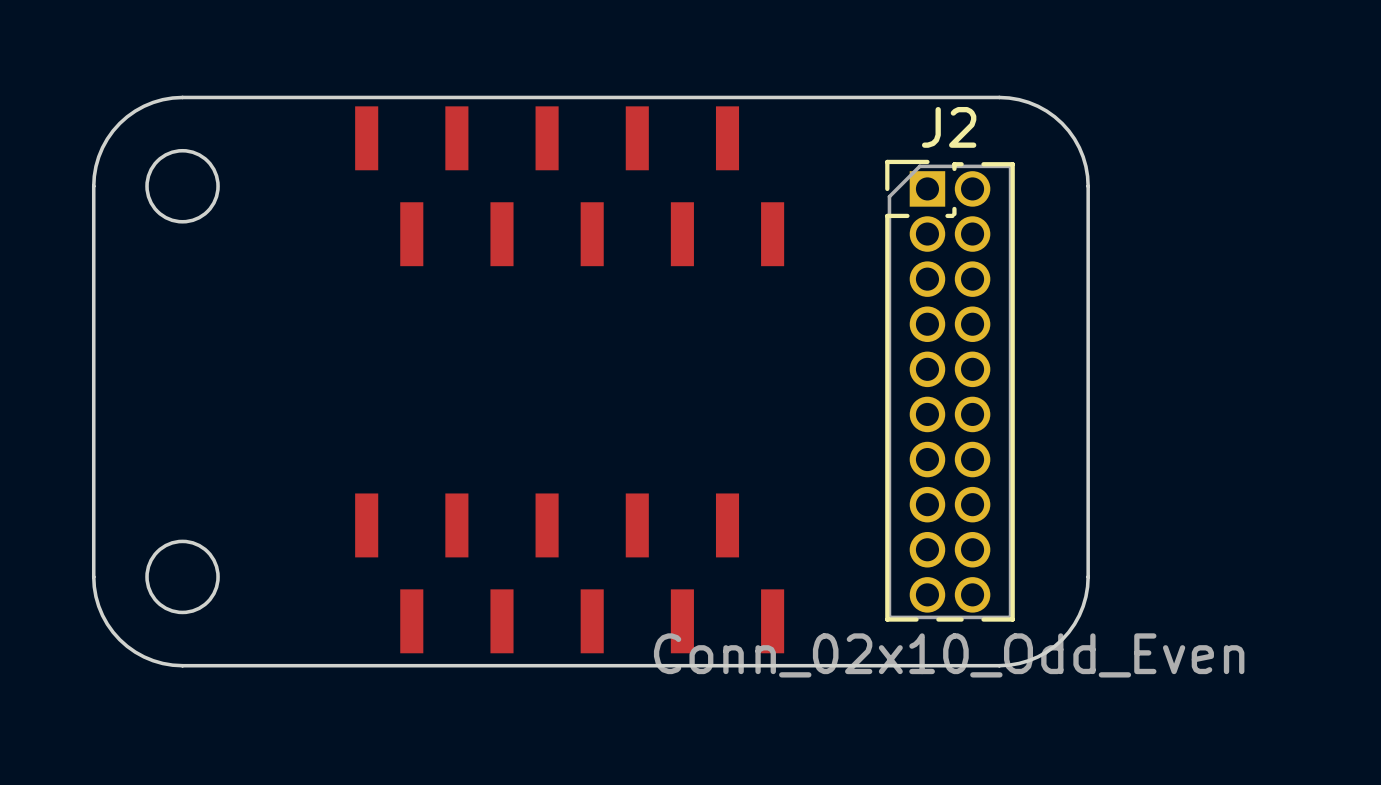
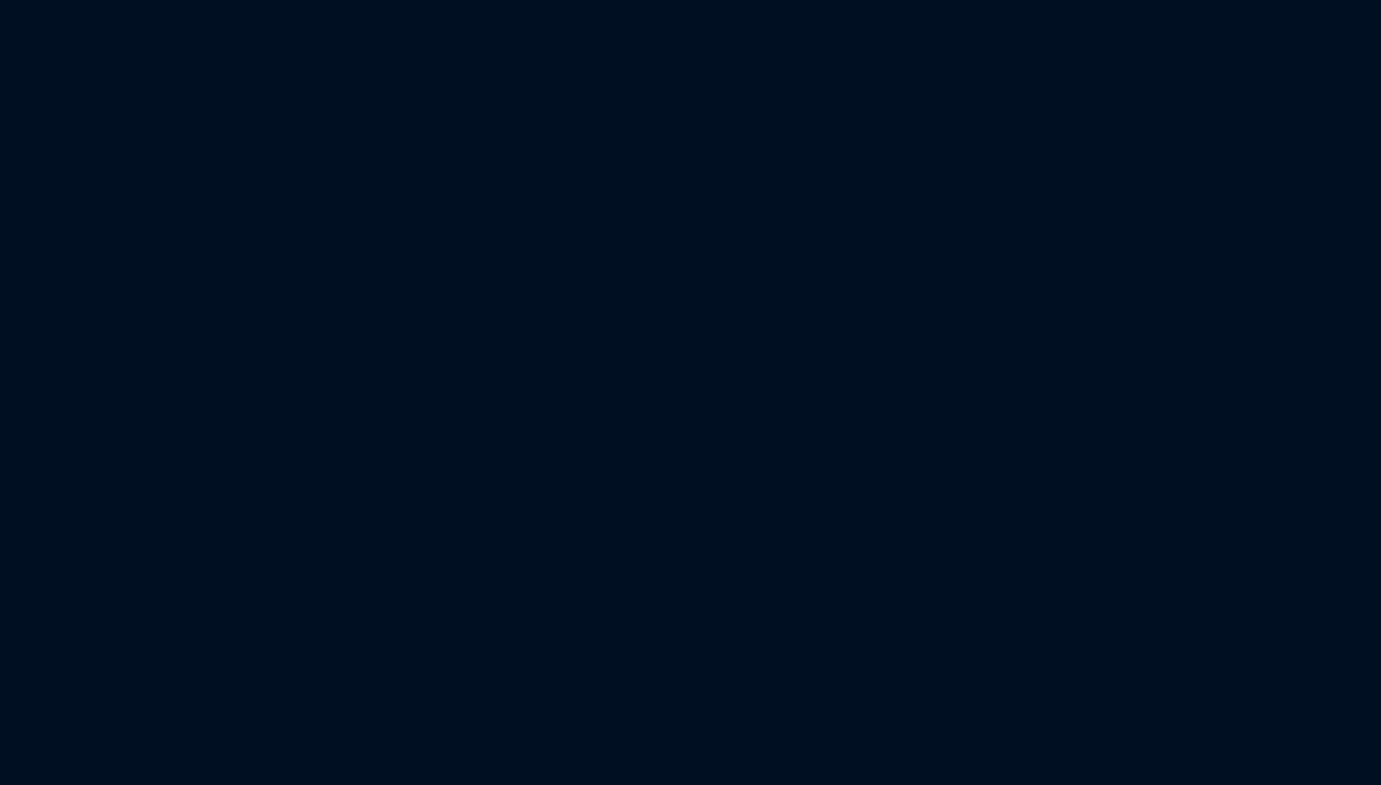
board edge: (999, 97) (182, 97) (162, 99) (135, 111) (113, 130) (102, 147) (95, 166) (93, 186) (93, 576) (95, 596) (107, 624) (119, 639) (135, 652) (153, 660) (182, 665) (999, 665) (1028, 660) (1046, 652) (1062, 639) (1074, 624) (1083, 606) (1087, 586) (1087, 176) (1079, 147) (1062, 123) (1037, 106) (1019, 99) (999, 97) -> none
round board edge: [145, 148, 220, 224] -> none
part: (569, 186) -> none
J2: Conn_02x10_Odd_Even (950, 390) -> none
round board edge: [145, 539, 220, 615] -> none
part: (569, 573) -> none

